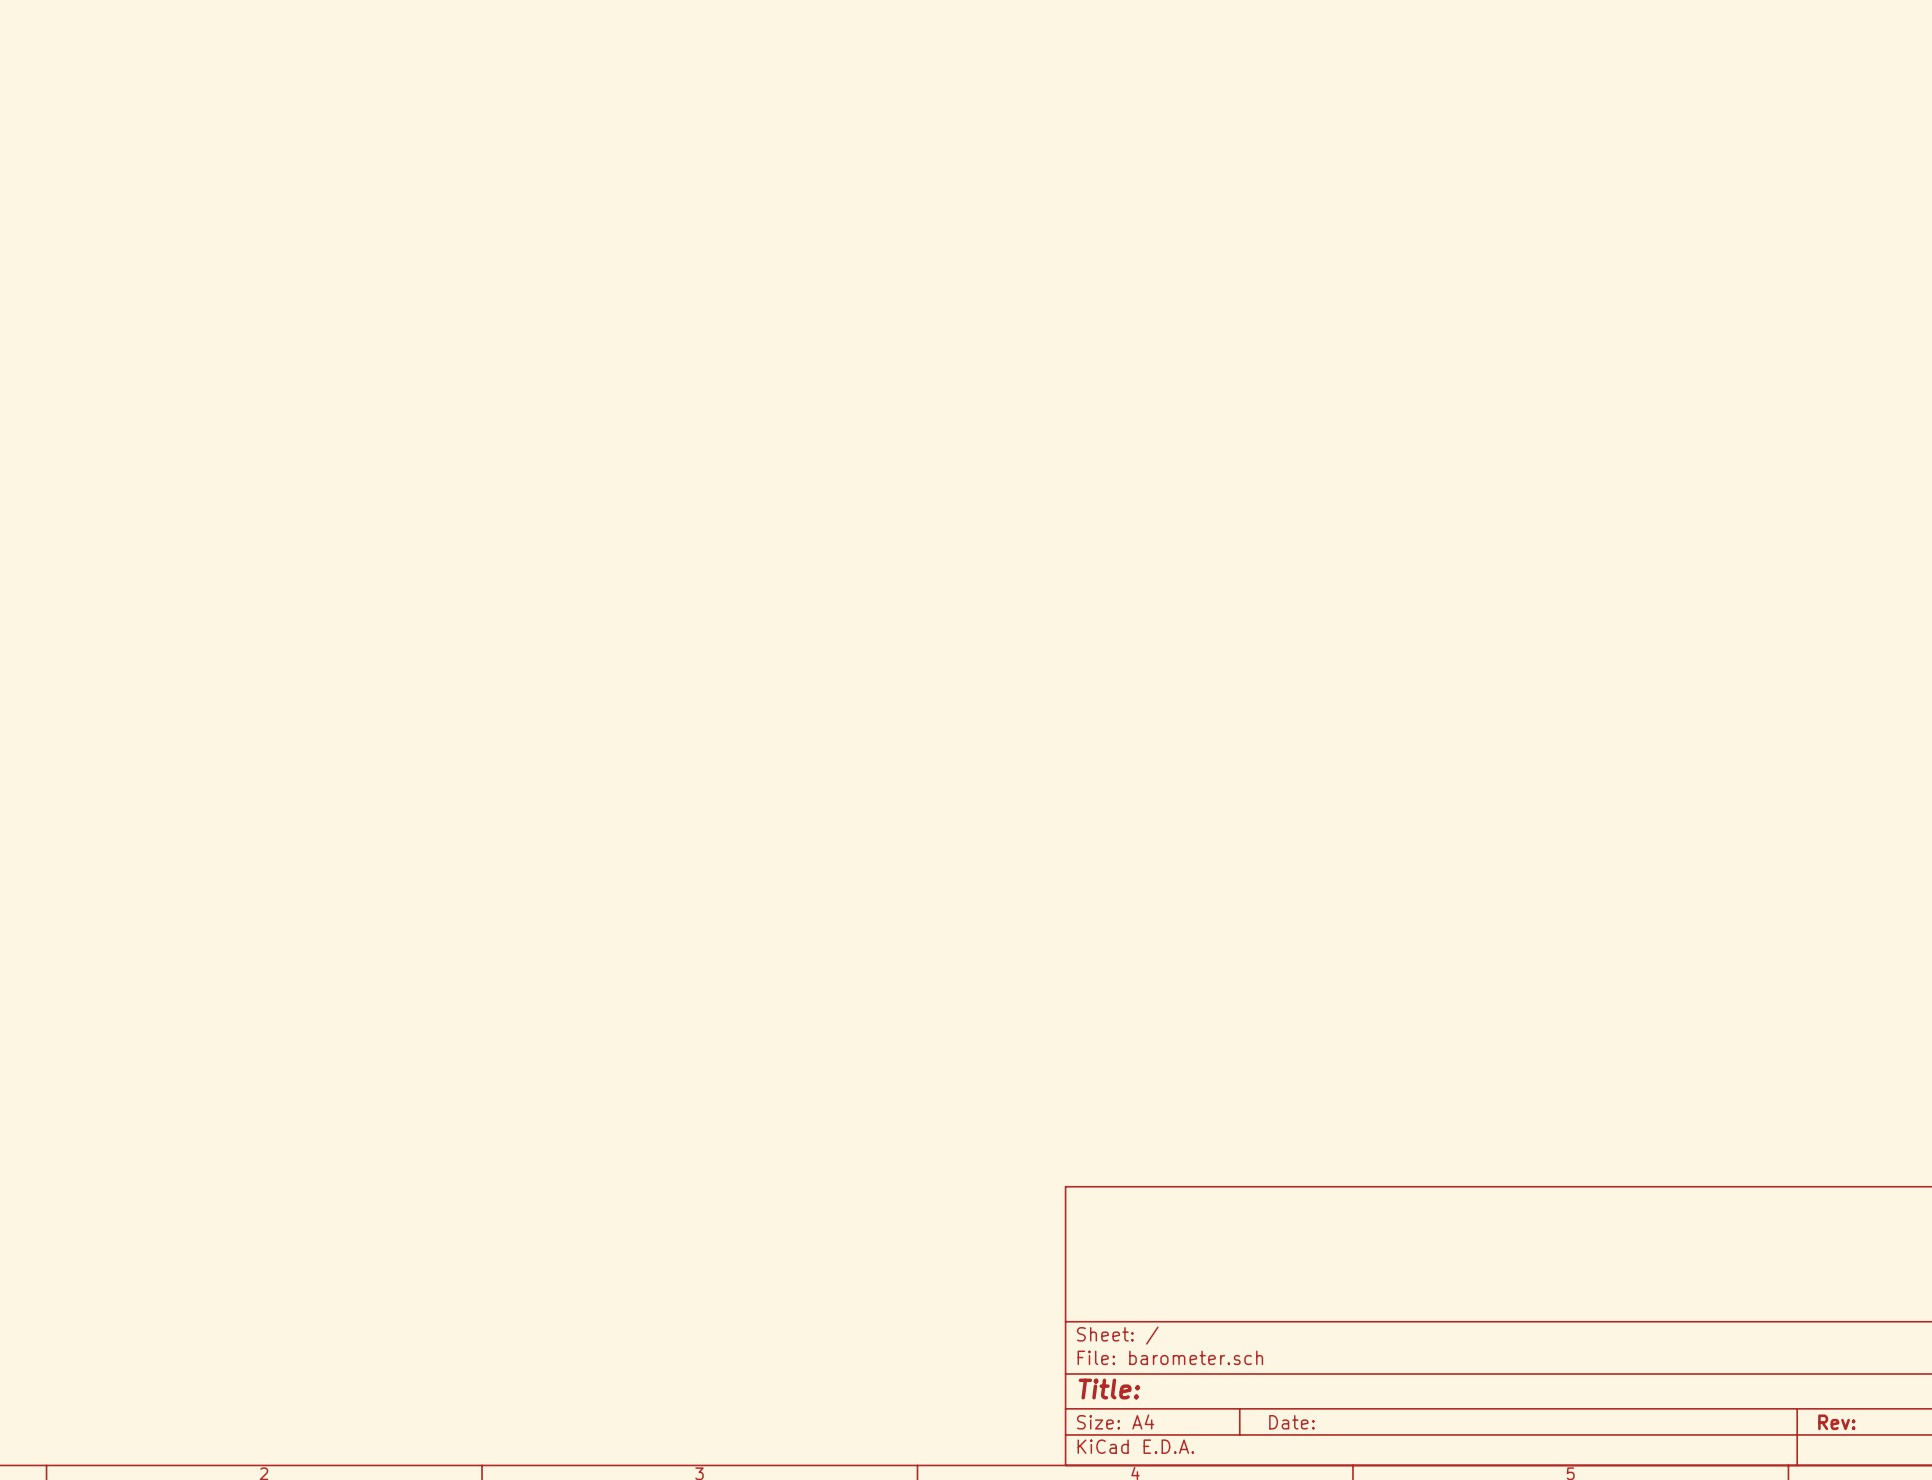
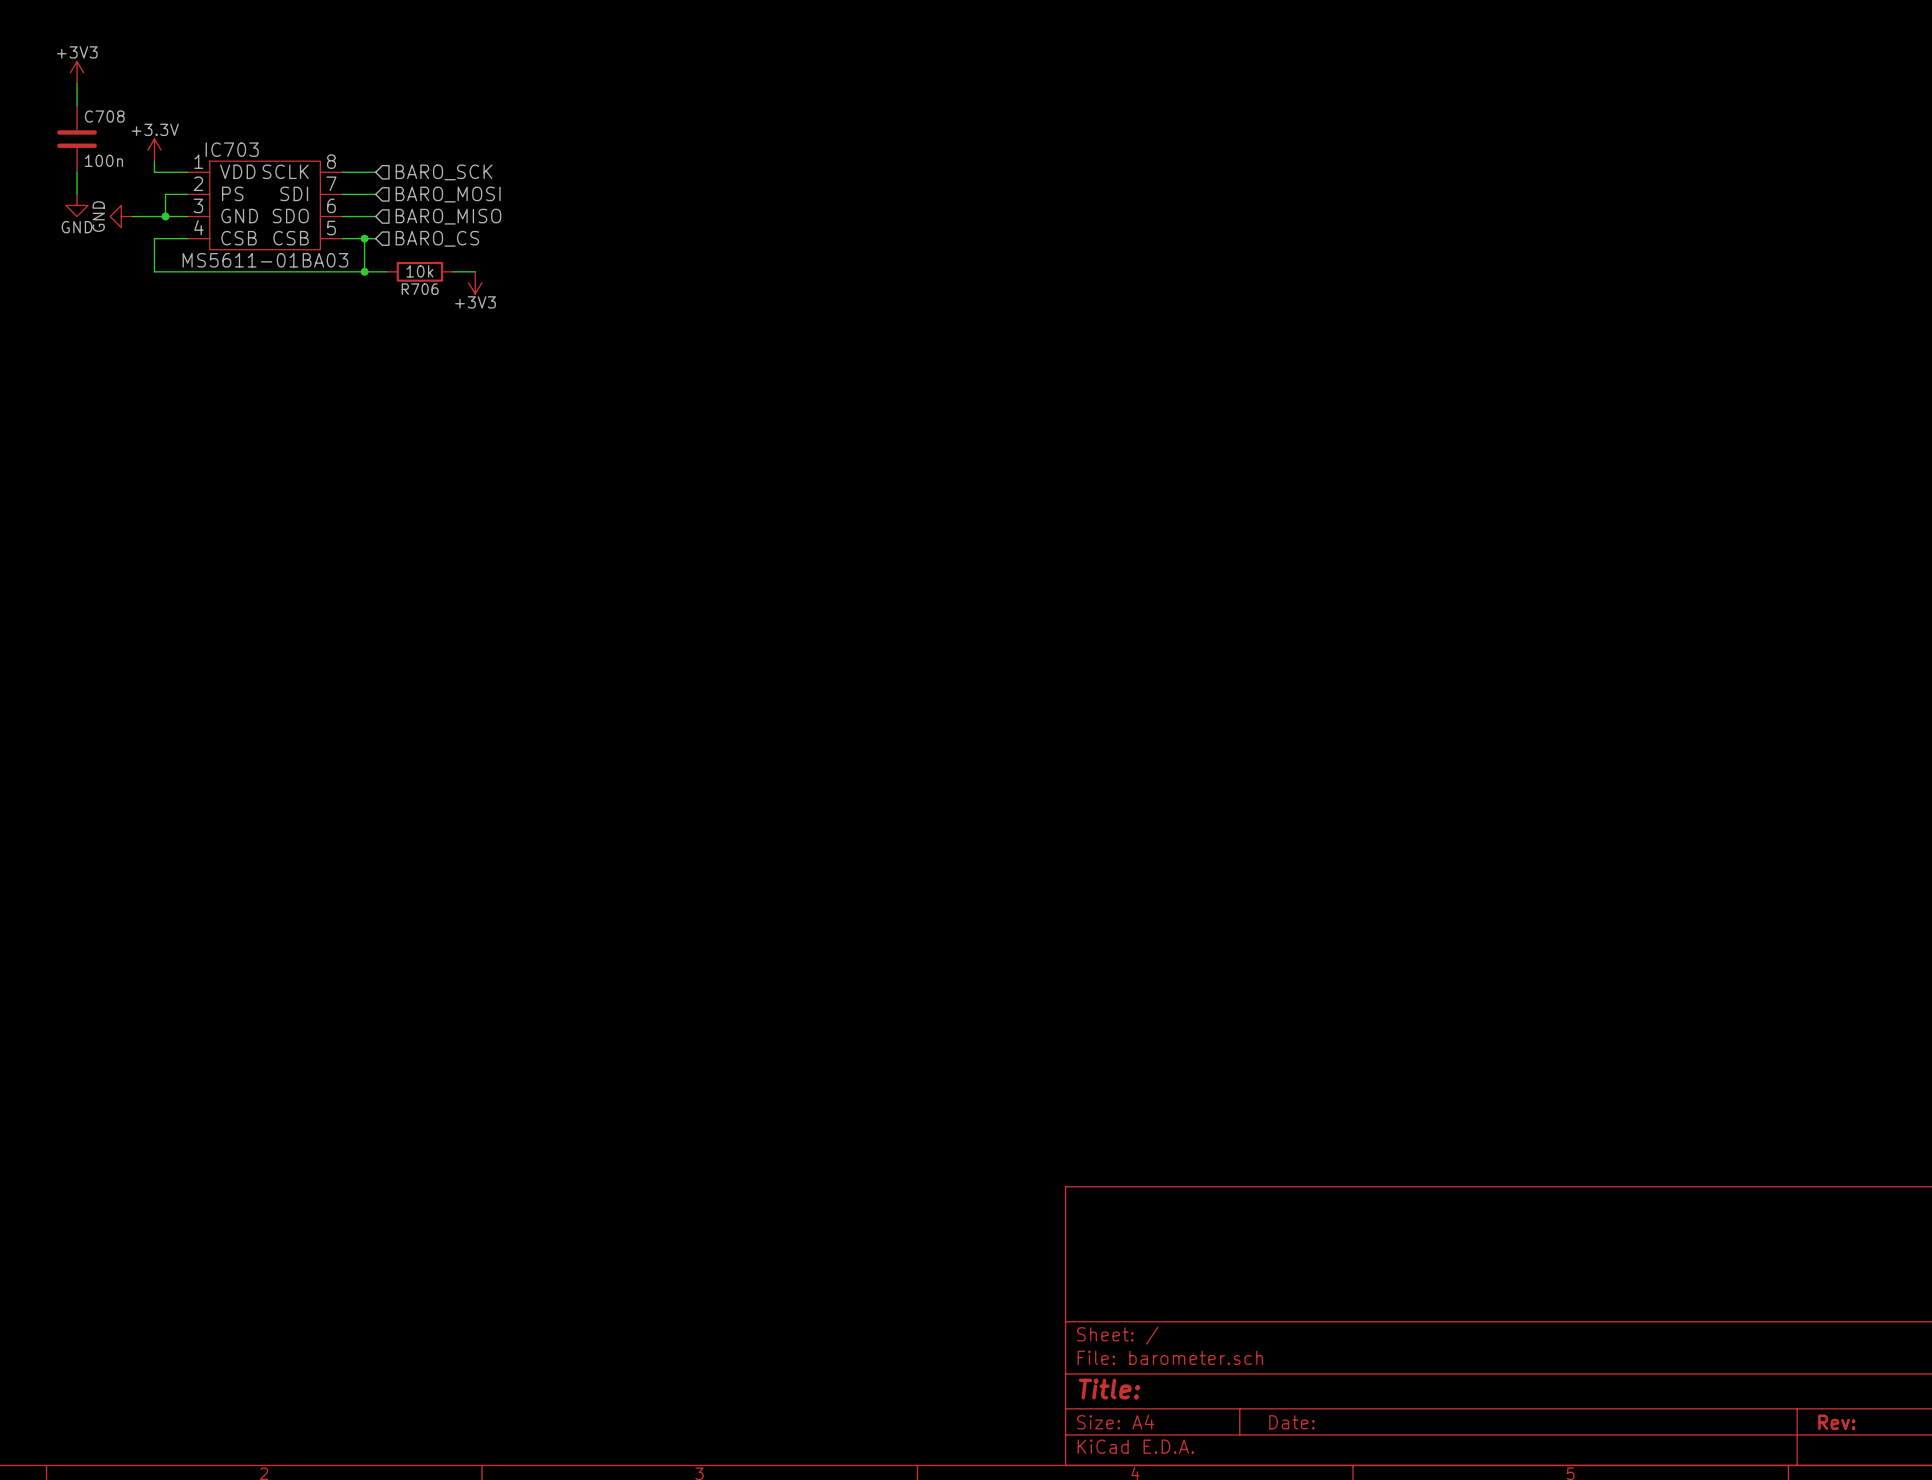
power symbol: none -> +3V3 (77, 72)
wire: none -> (77, 83) (77, 105)
C708: none -> 100n (77, 139)
power symbol: none -> +3.3V (154, 150)
wire: none -> (154, 161) (154, 172) (187, 172)
wire: none -> (77, 172) (77, 194)
wire: none -> (342, 172) (375, 172)
hierarchical label: none -> BARO_SCK (444, 172)
wire: none -> (187, 194) (165, 194) (165, 216)
wire: none -> (342, 194) (375, 194)
hierarchical label: none -> BARO_MOSI (448, 194)
power symbol: none -> GND (77, 205)
IC703: none -> MS5611-01BA03 (265, 205)
power symbol: none -> GND (121, 216)
wire: none -> (132, 216) (187, 216)
junction: none -> (165, 216)
wire: none -> (342, 216) (375, 216)
hierarchical label: none -> BARO_MISO (448, 216)
wire: none -> (187, 238) (154, 238) (154, 271) (386, 271)
wire: none -> (342, 238) (375, 238)
wire: none -> (364, 238) (364, 271)
junction: none -> (364, 238)
hierarchical label: none -> BARO_CS (437, 238)
junction: none -> (364, 271)
R706: none -> 10k (419, 271)
wire: none -> (453, 271) (475, 271)
power symbol: none -> +3V3 (475, 282)

